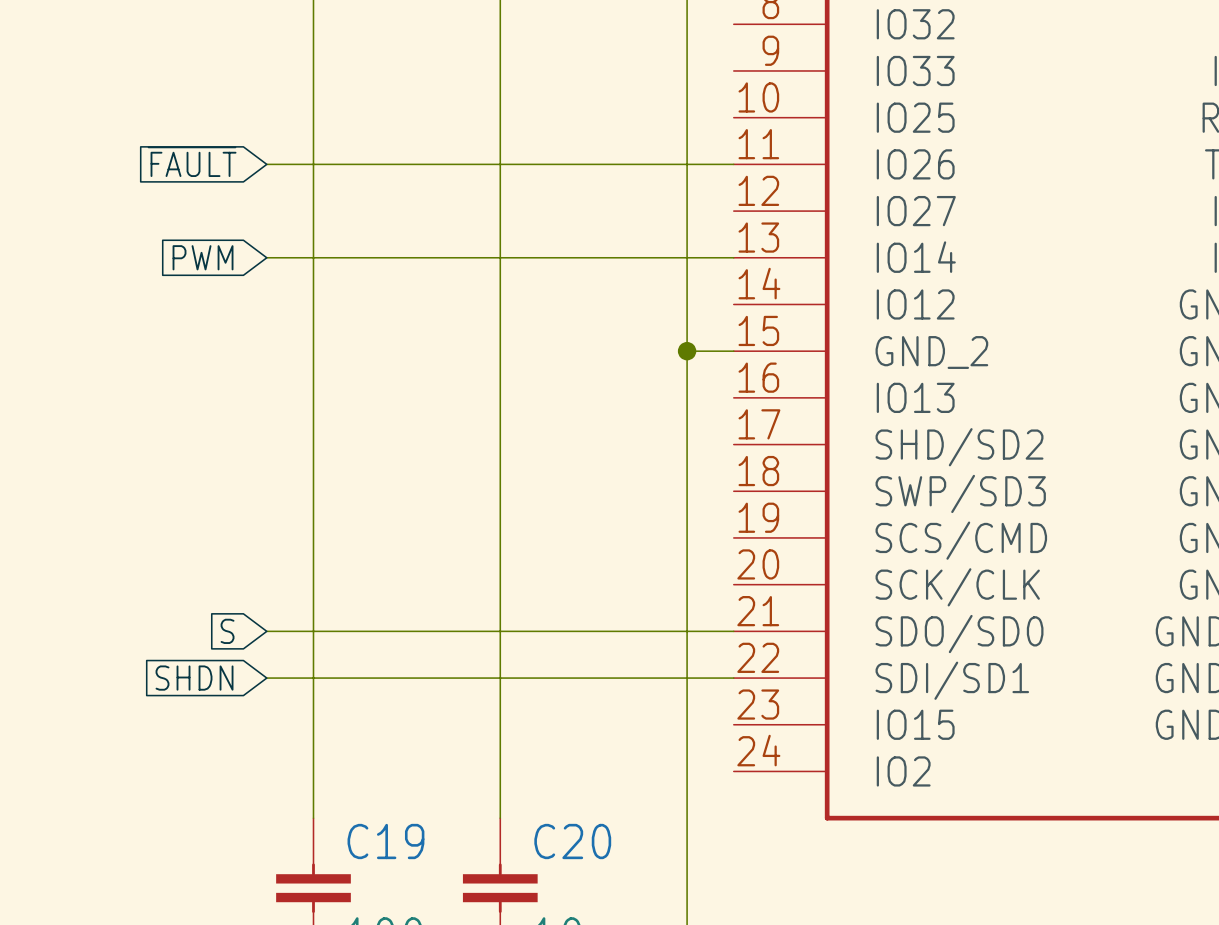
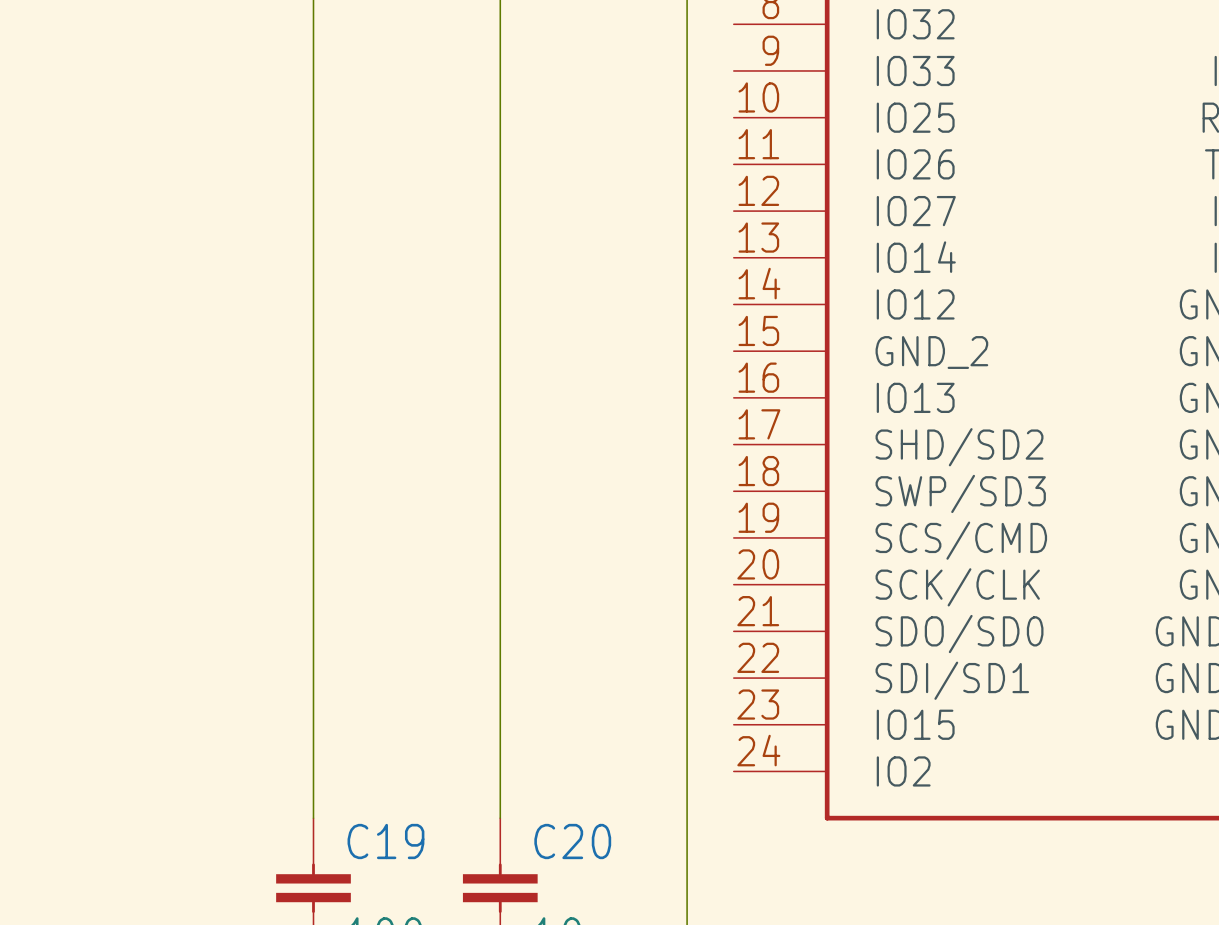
global label: ~{FAULT} (192, 161) -> none
wire: (266, 164) (733, 164) -> none
global label: PWM (203, 257) -> none
wire: (266, 257) (733, 257) -> none
wire: (687, 351) (733, 351) -> none
junction: (687, 351) -> none
global label: S (227, 631) -> none
wire: (266, 631) (733, 631) -> none
global label: SHDN (194, 678) -> none
wire: (266, 678) (733, 678) -> none

